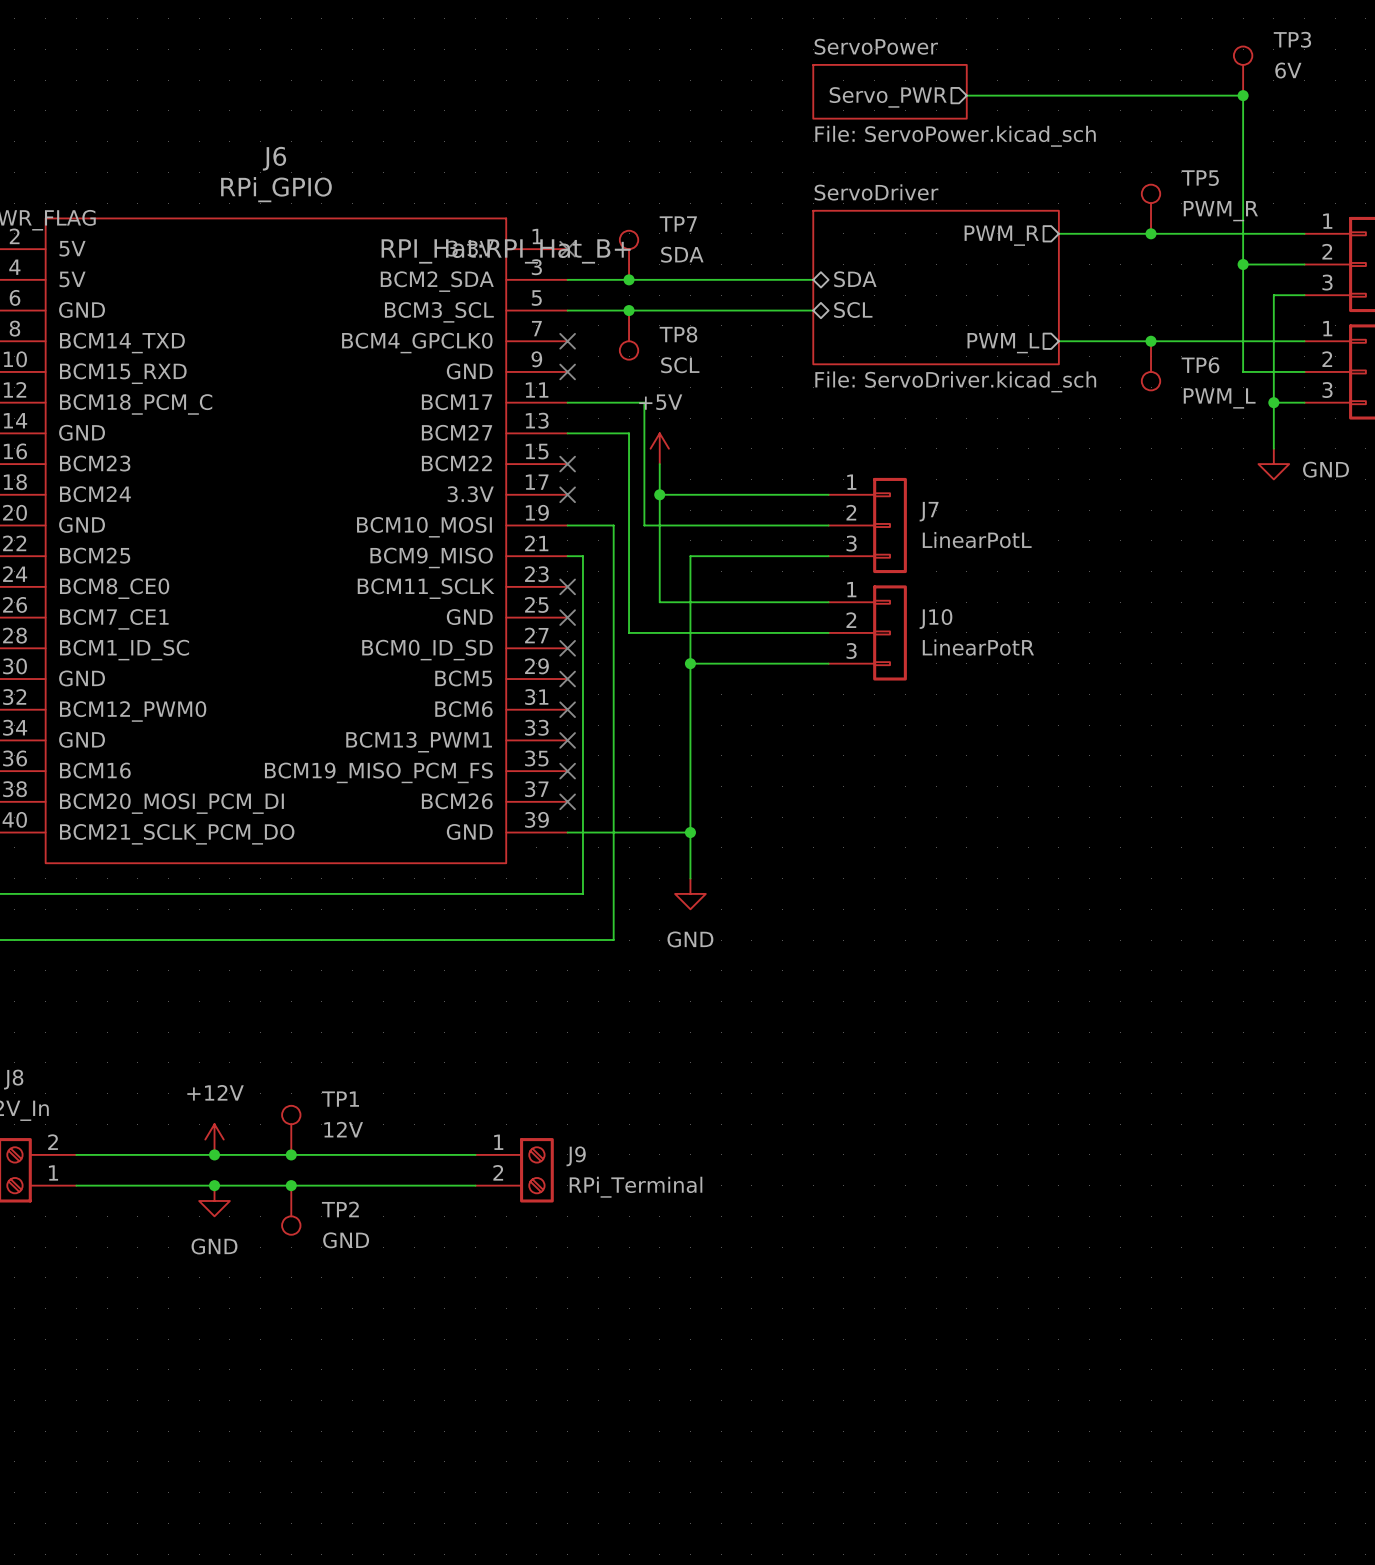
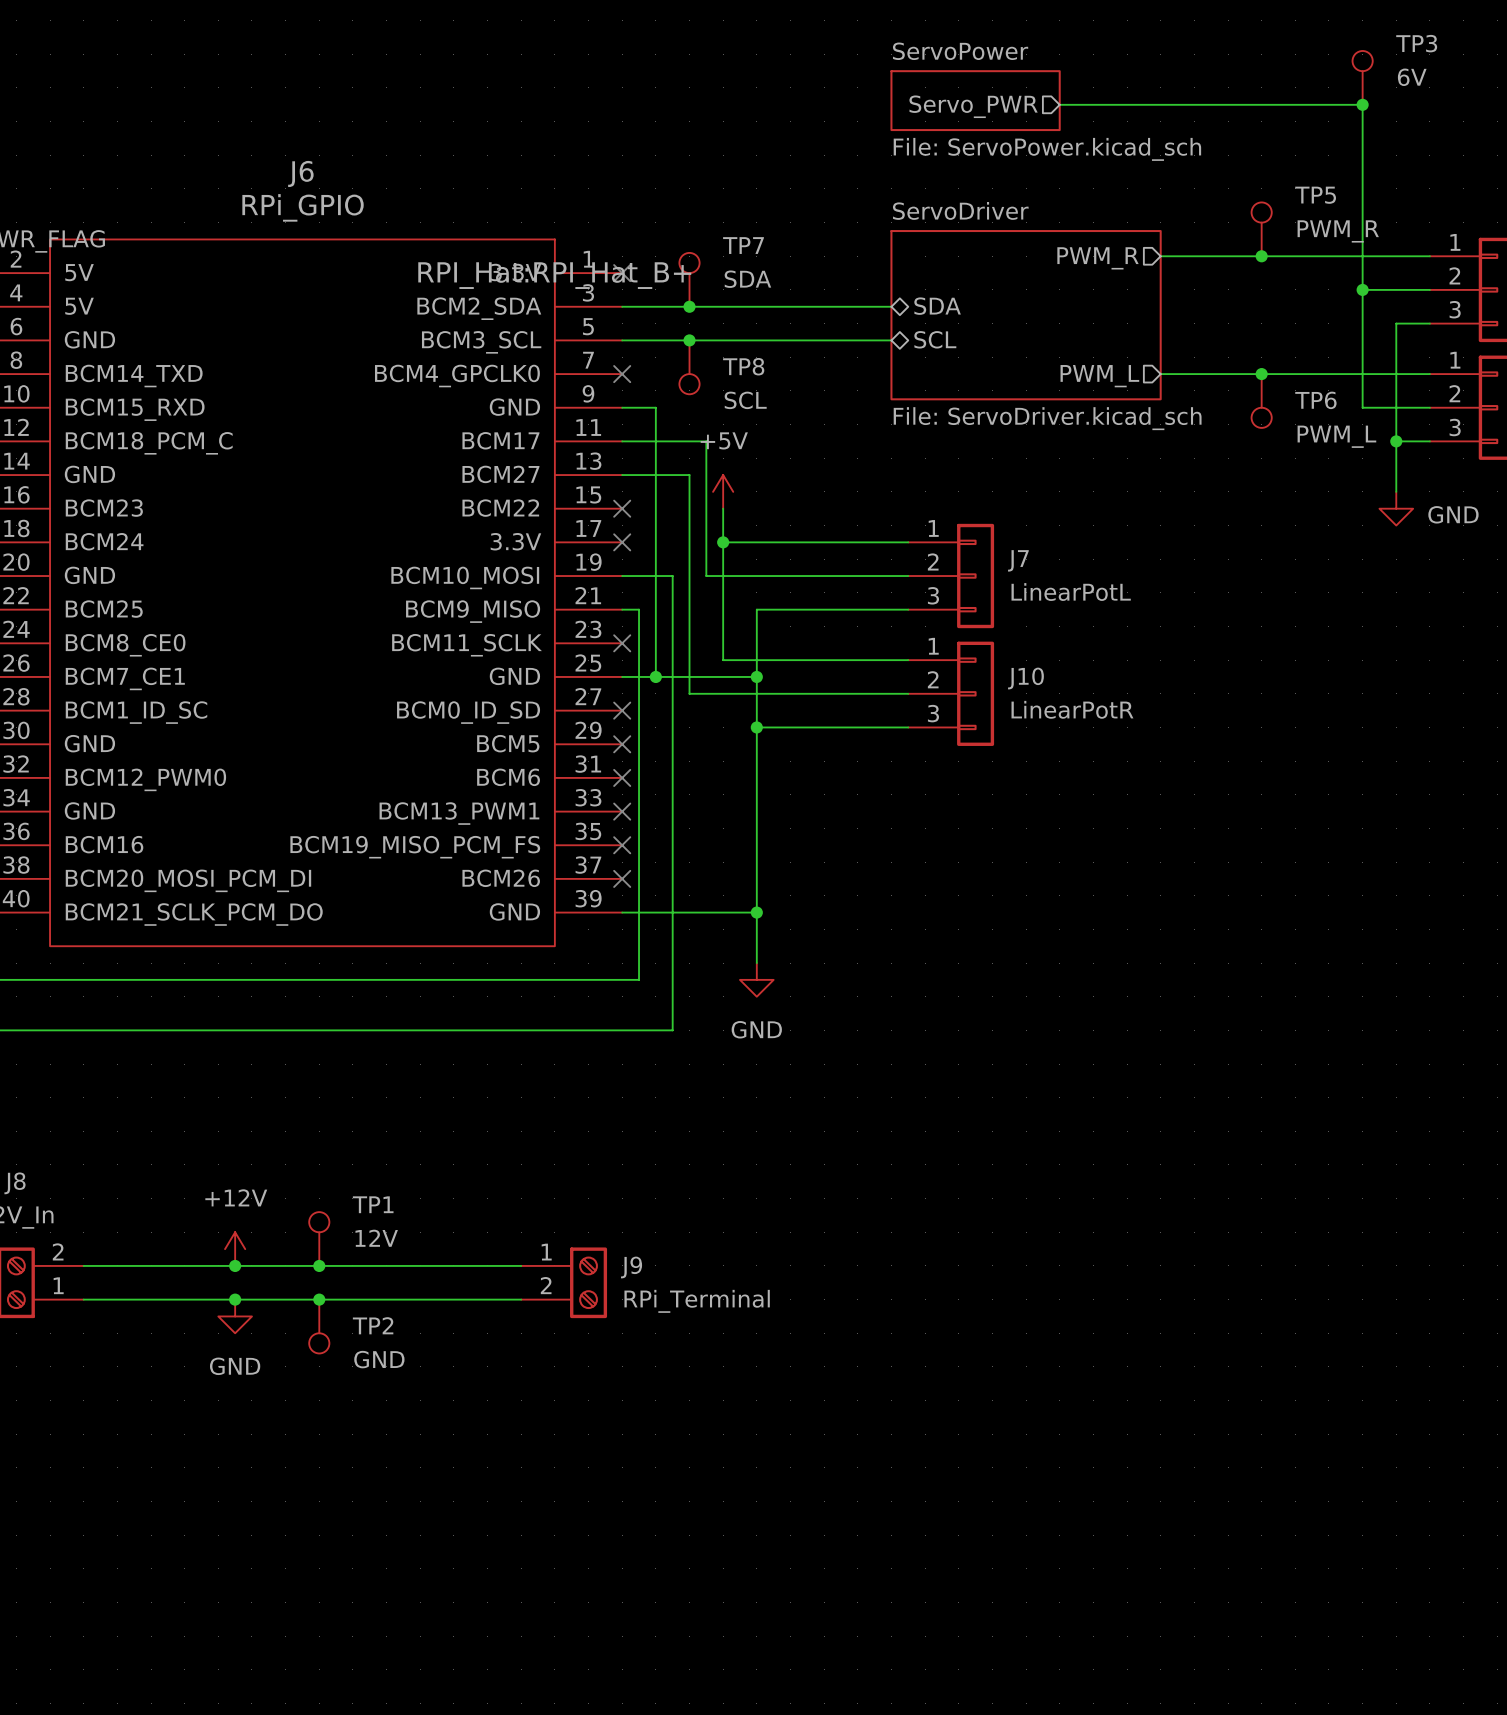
wire: none -> (622, 407) (655, 407) (655, 676)
no-connect mark: (567, 371) -> none
wire: none -> (622, 676) (756, 676)
no-connect mark: (567, 617) -> none
junction: none -> (655, 676)
junction: none -> (756, 676)

